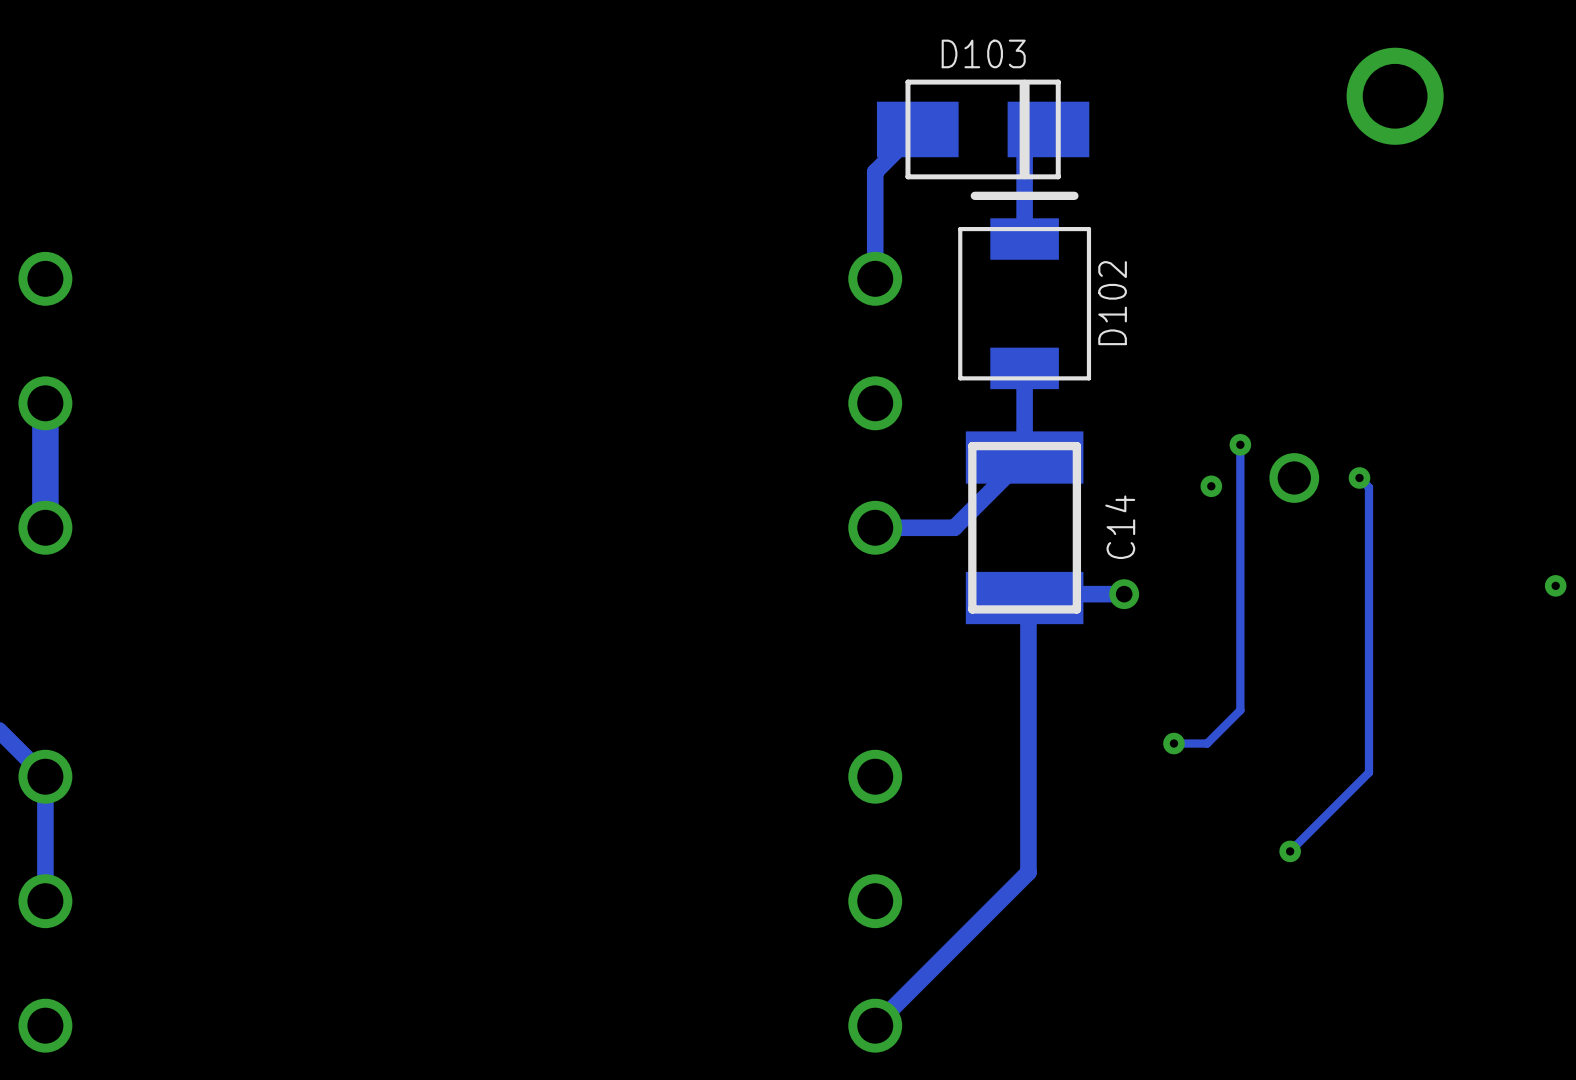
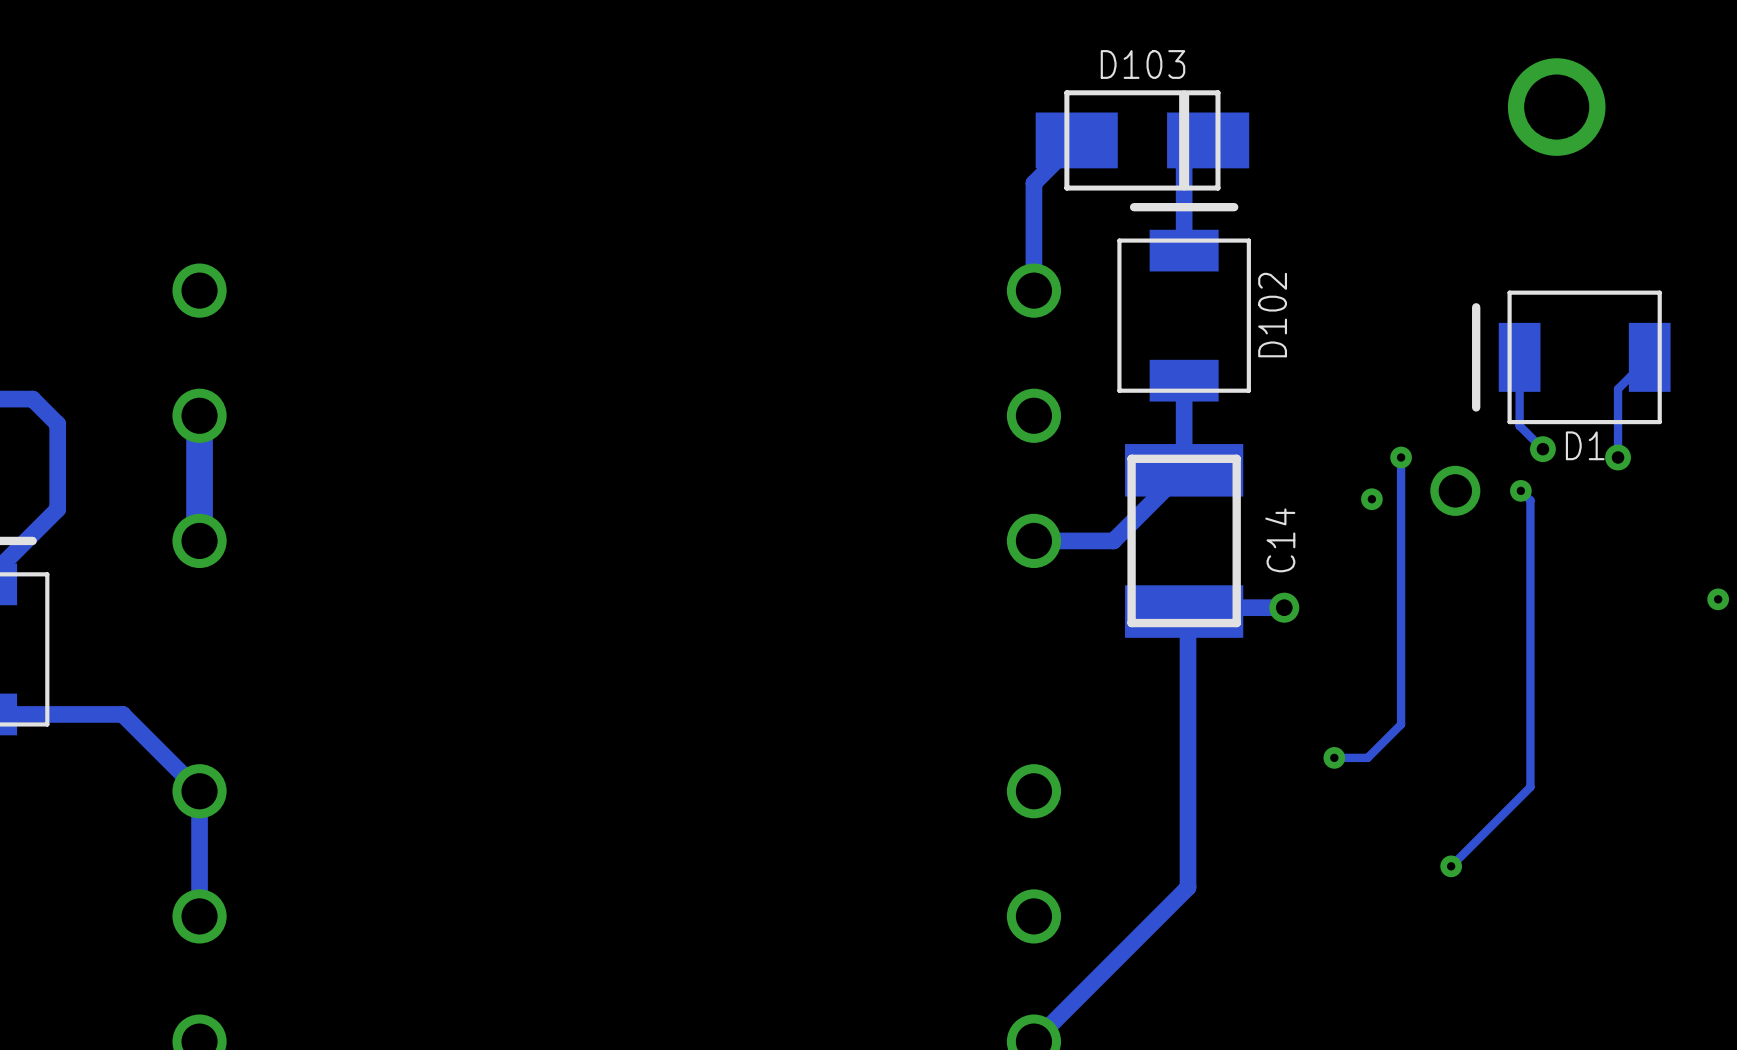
track: none -> (1519, 357) (1519, 425) (1542, 449)
D1: none -> (1571, 357)
track: none -> (1649, 357) (1618, 389) (1618, 457)
via: none -> (1542, 449)
via: none -> (1618, 457)

